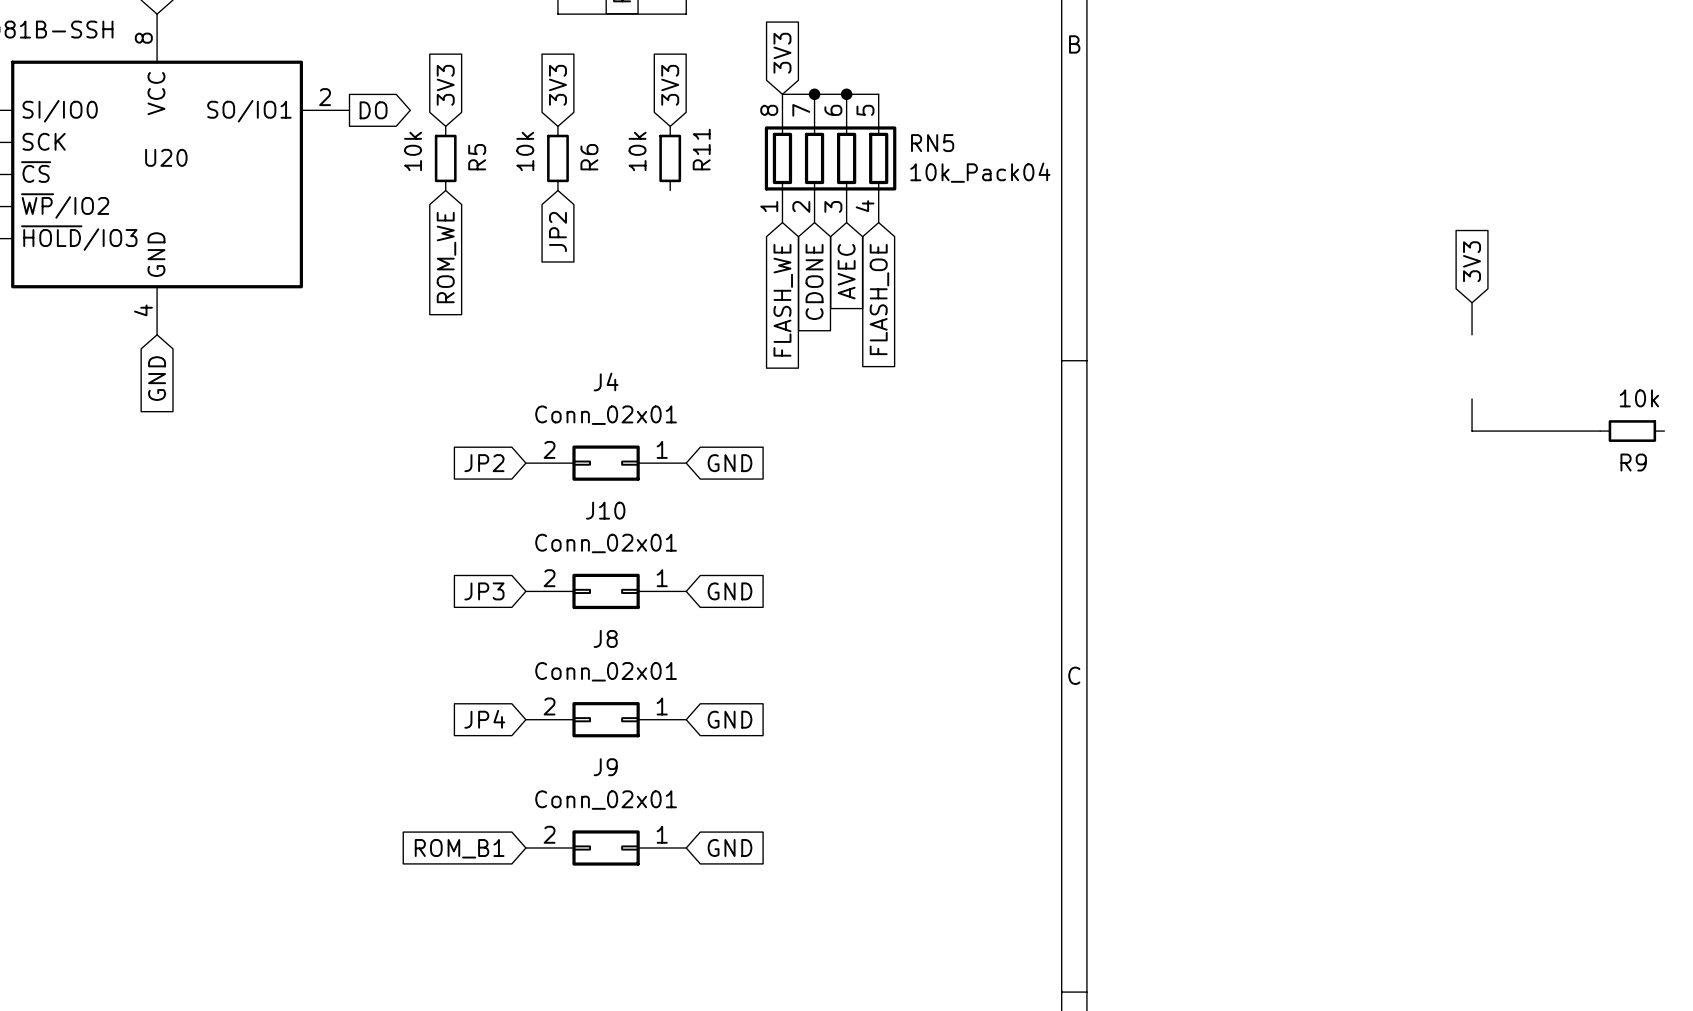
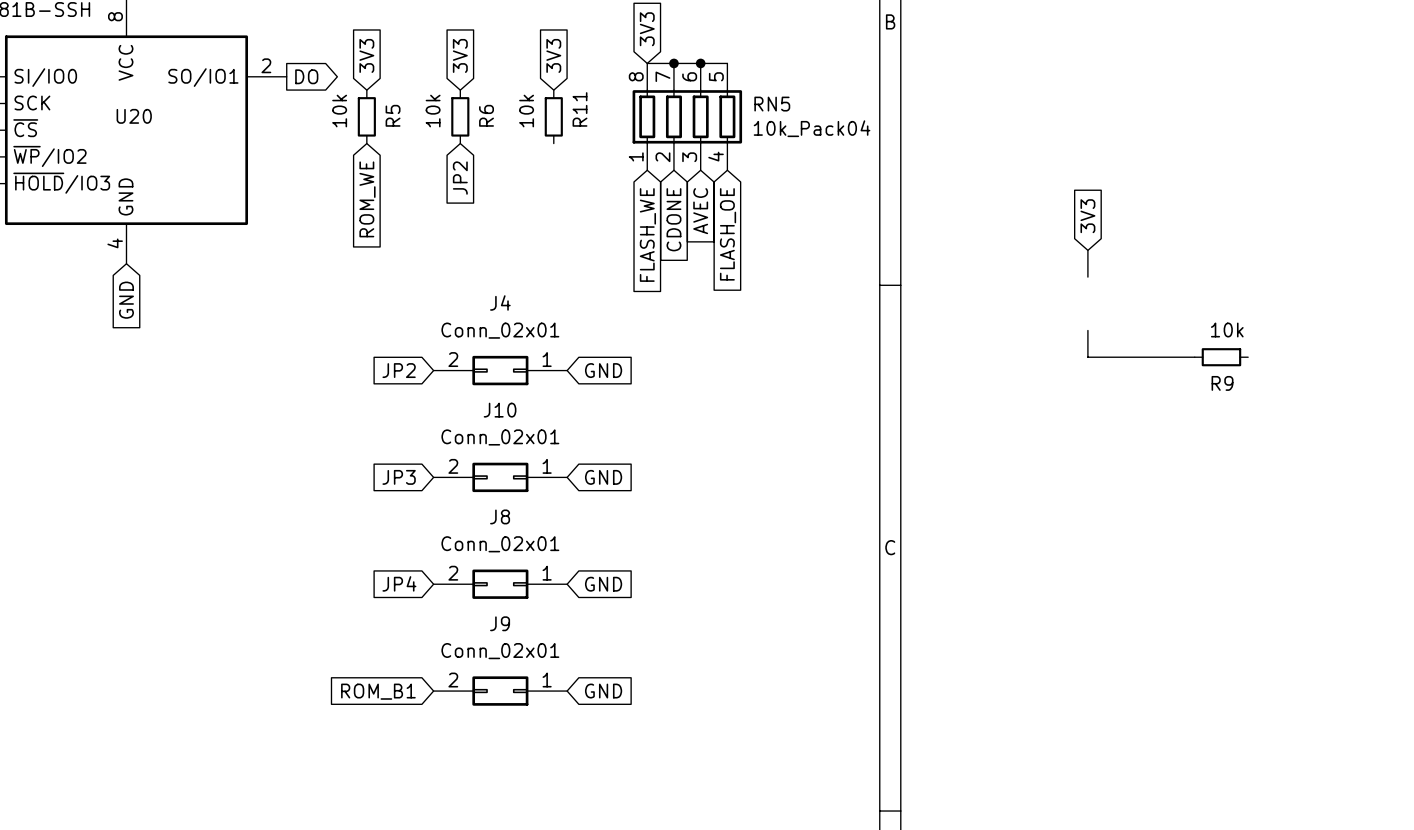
global label position: 3V3 (1472, 261) -> 3V3 (1087, 216)
wire: (1472, 302) (1472, 334) -> (1087, 250) (1087, 277)
wire: (1472, 398) (1472, 431) (1600, 431) -> (1087, 330) (1087, 357) (1194, 357)
R9 position: (1632, 431) -> (1221, 357)

